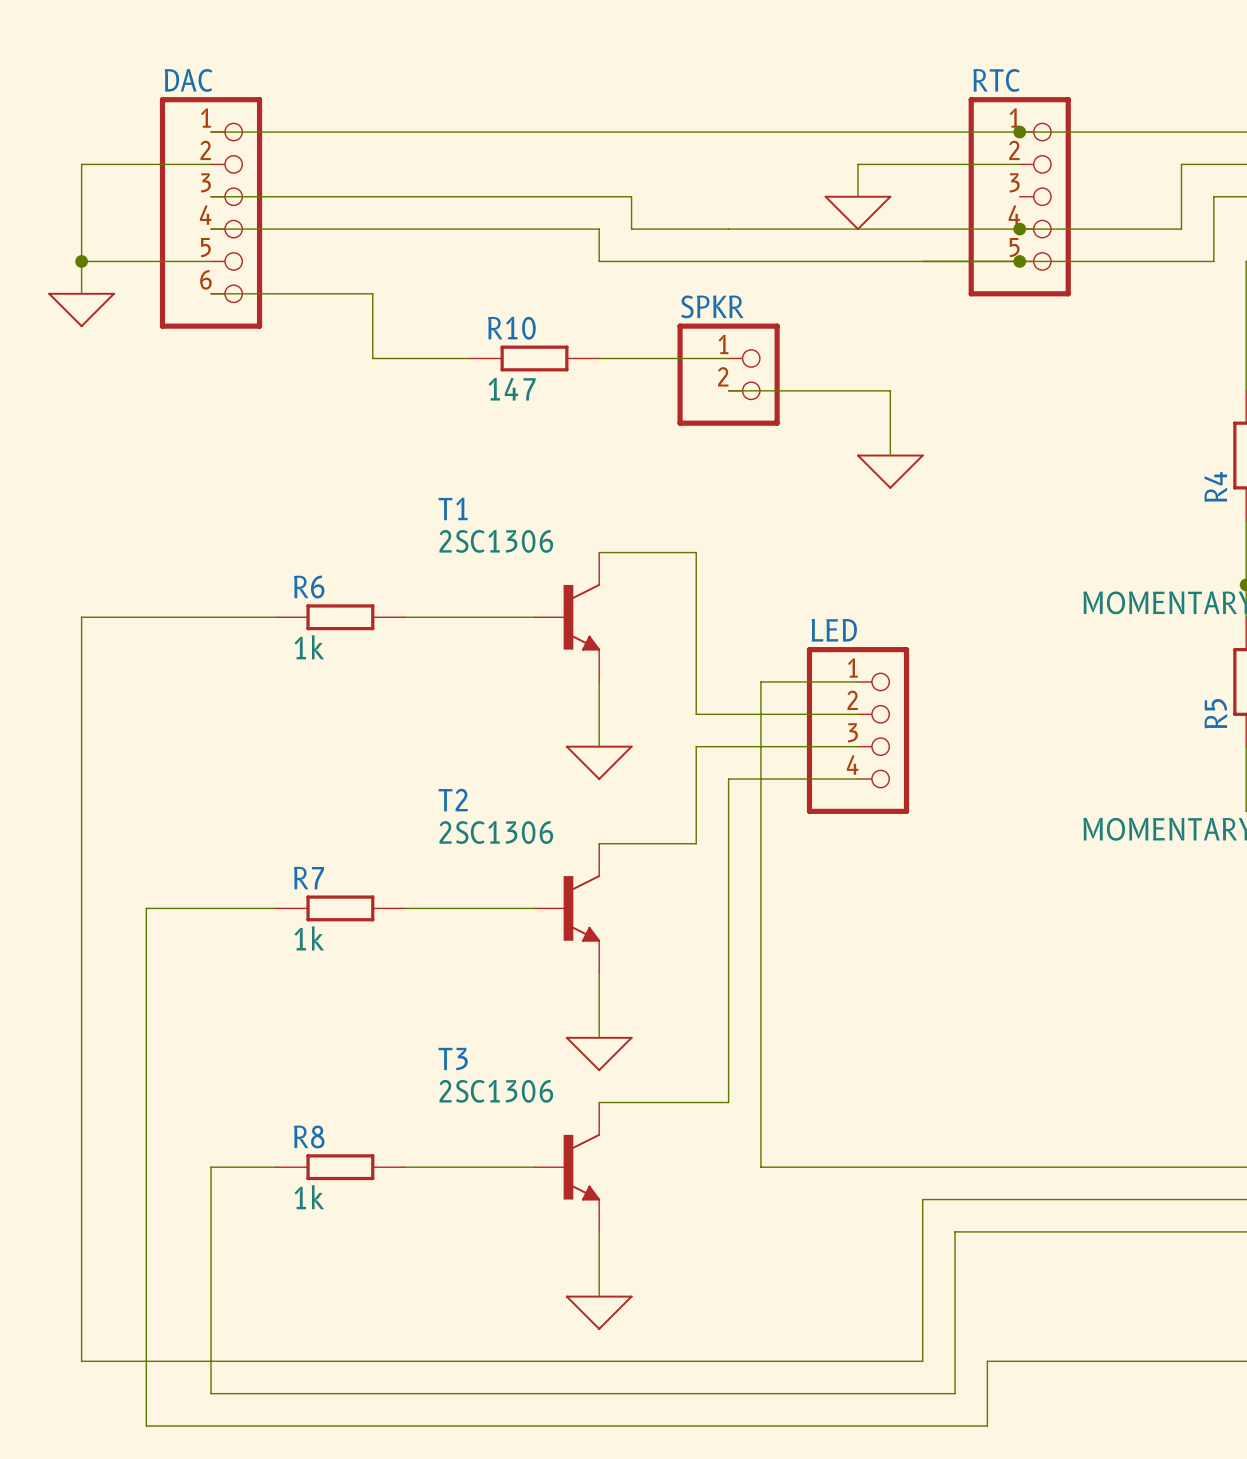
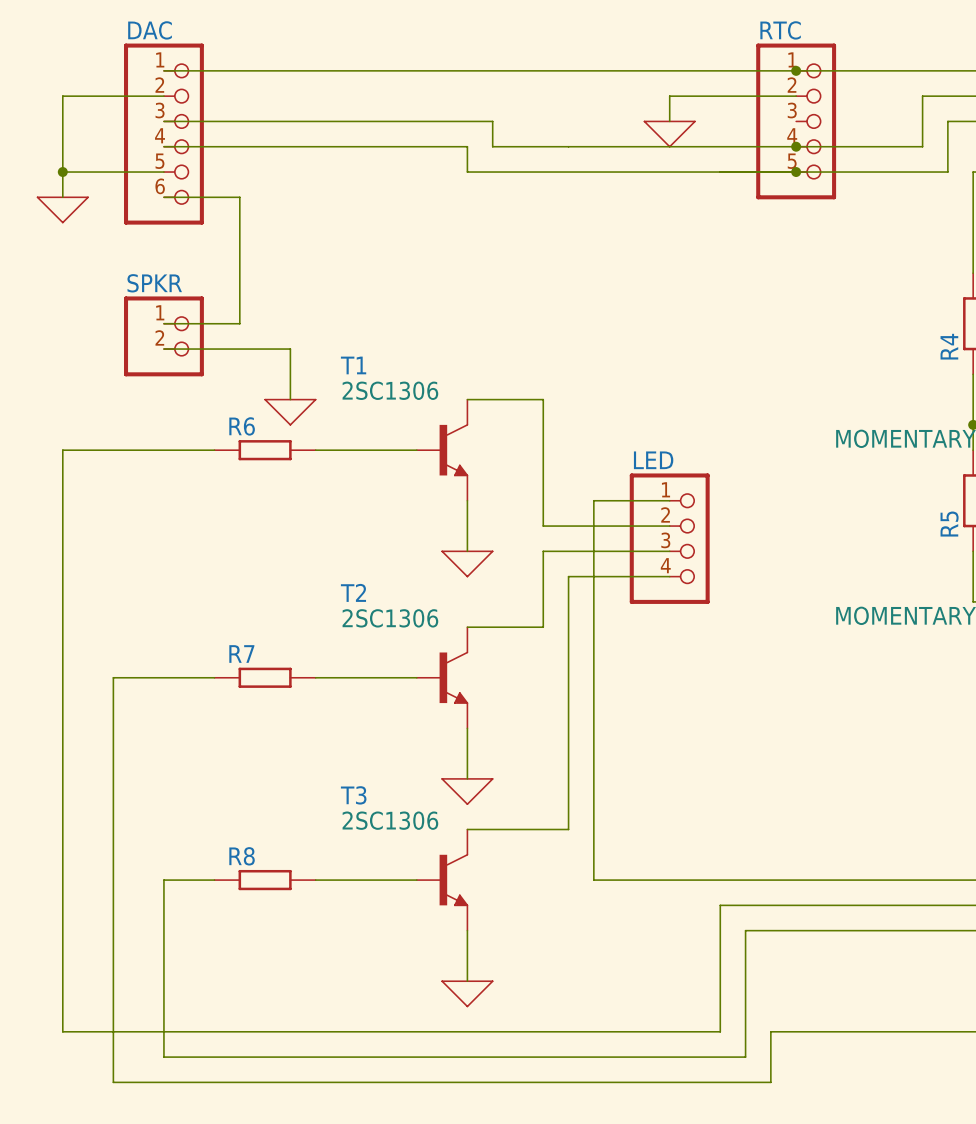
wire: (308, 293) (372, 293) (372, 358) (469, 358) -> (239, 197) (239, 323) (163, 323)
R10: 147 (534, 358) -> none
wire: (599, 358) (728, 358) -> none
SPKR: (728, 374) -> none
wire: (728, 390) (890, 390) (890, 455) -> none
SPKR: none -> (163, 336)
power symbol: (890, 471) -> none
wire: none -> (163, 349) (290, 349) (290, 399)
power symbol: none -> (290, 412)
R6 value: 1k (309, 647) -> none
R7 value: 1k (309, 938) -> none
R8 value: 1k (309, 1197) -> none

